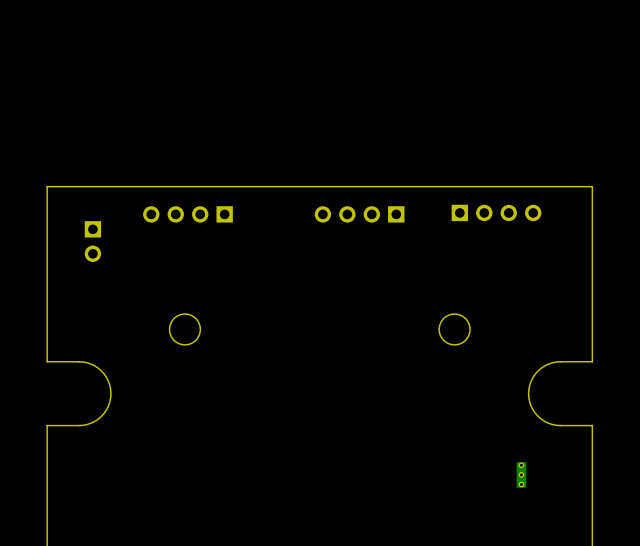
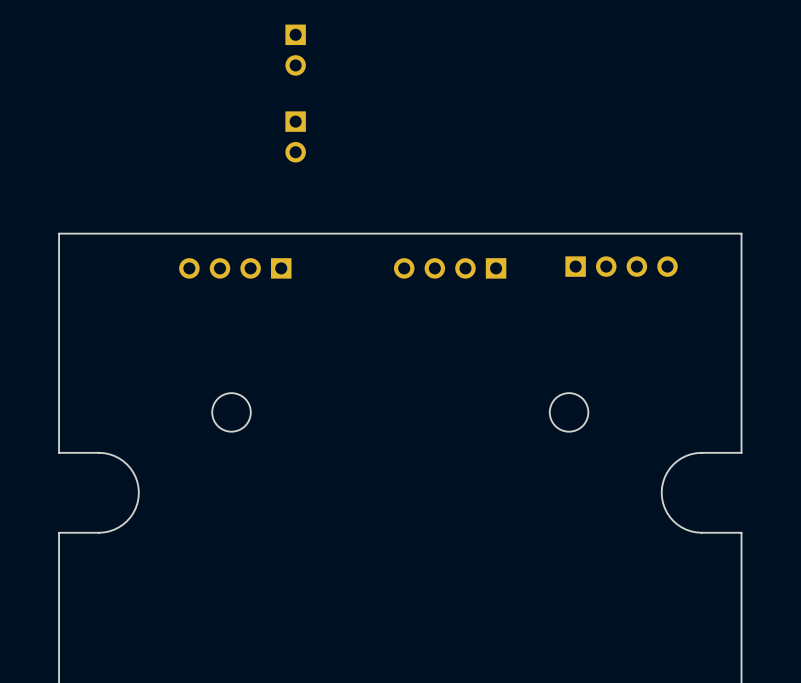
part: none -> (295, 50)
part: none -> (295, 136)
part: (92, 241) -> none
part: (521, 474) -> none

